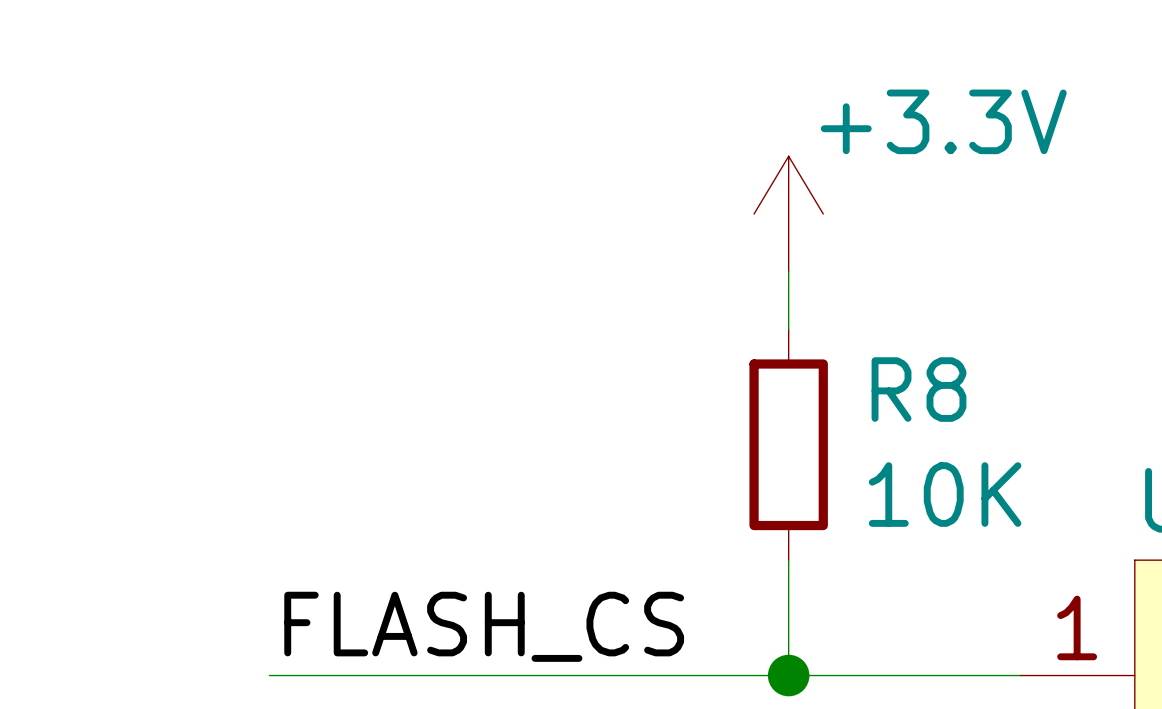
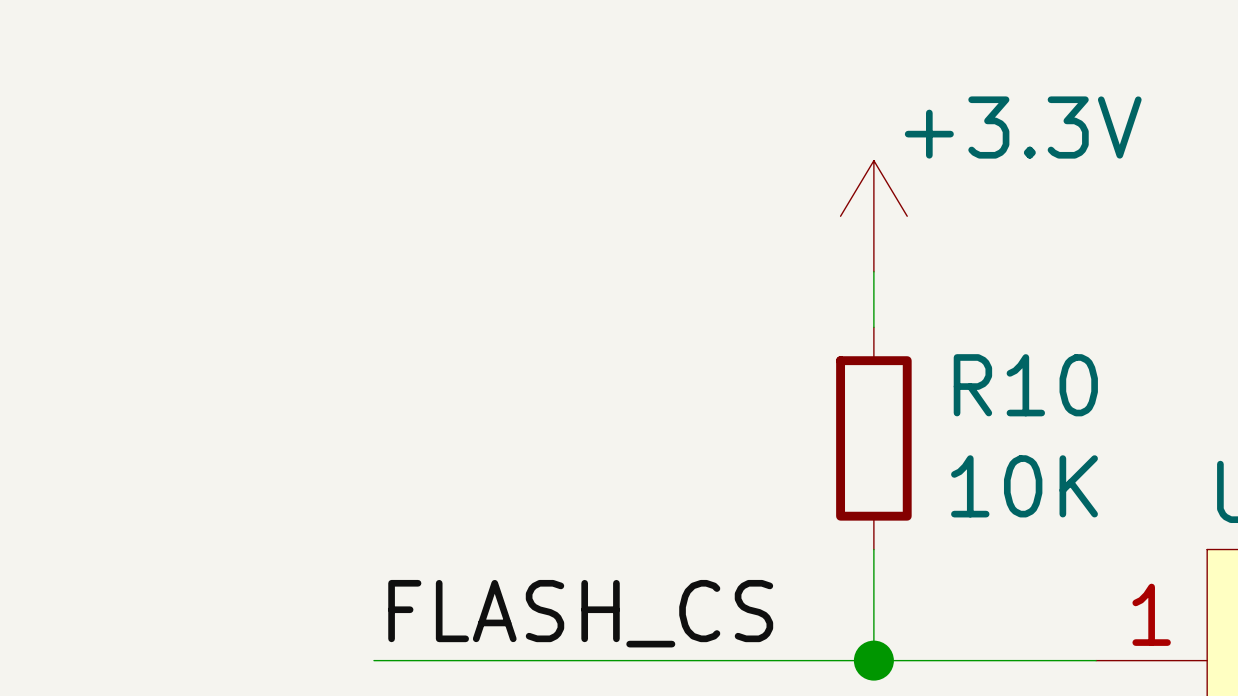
R8 name: R8 (918, 389) -> R10 (1025, 385)

